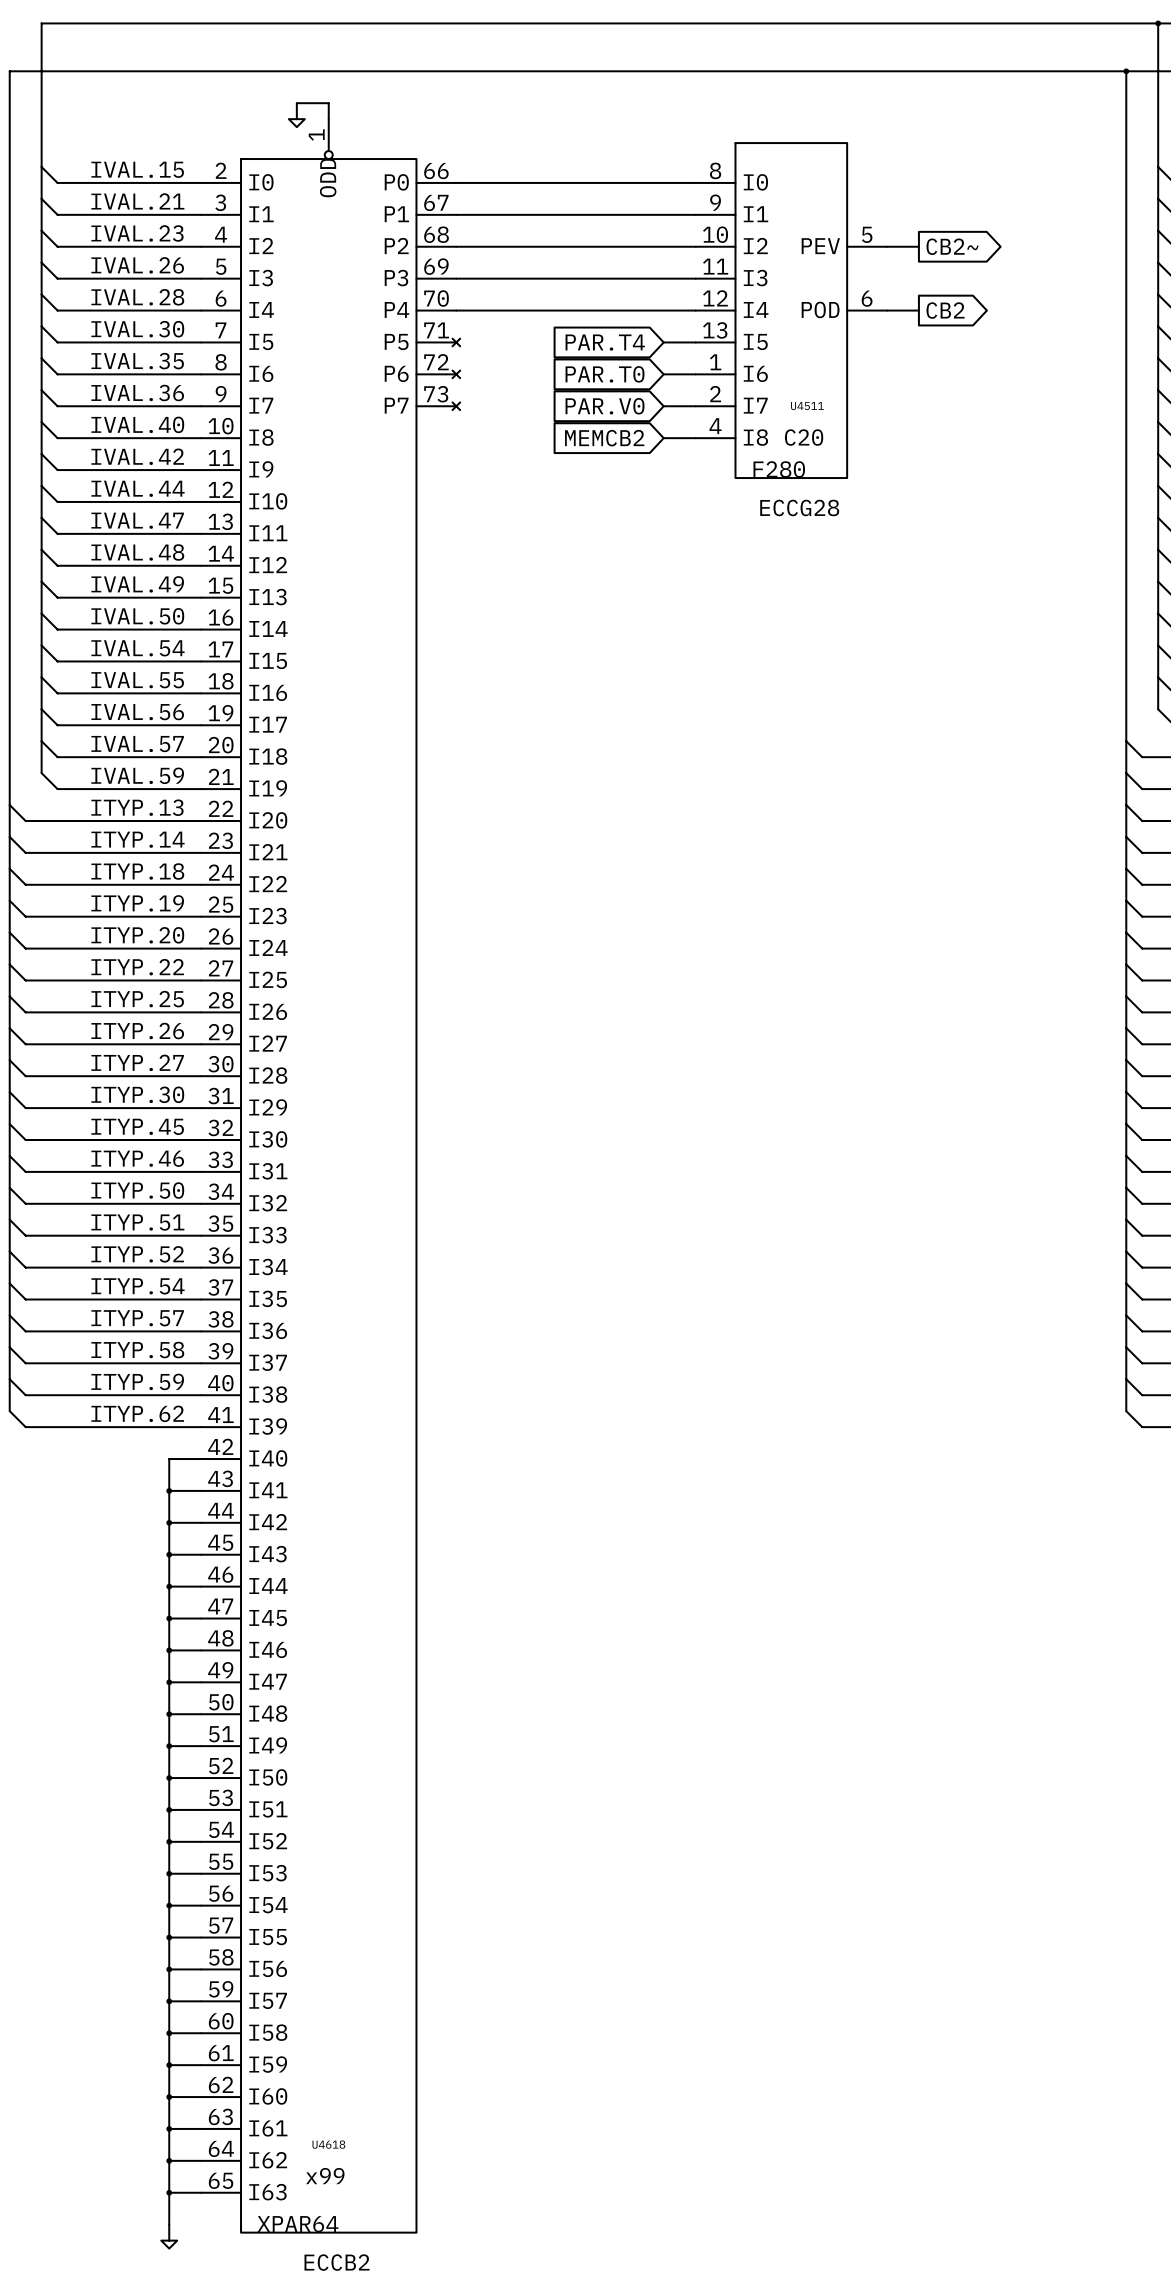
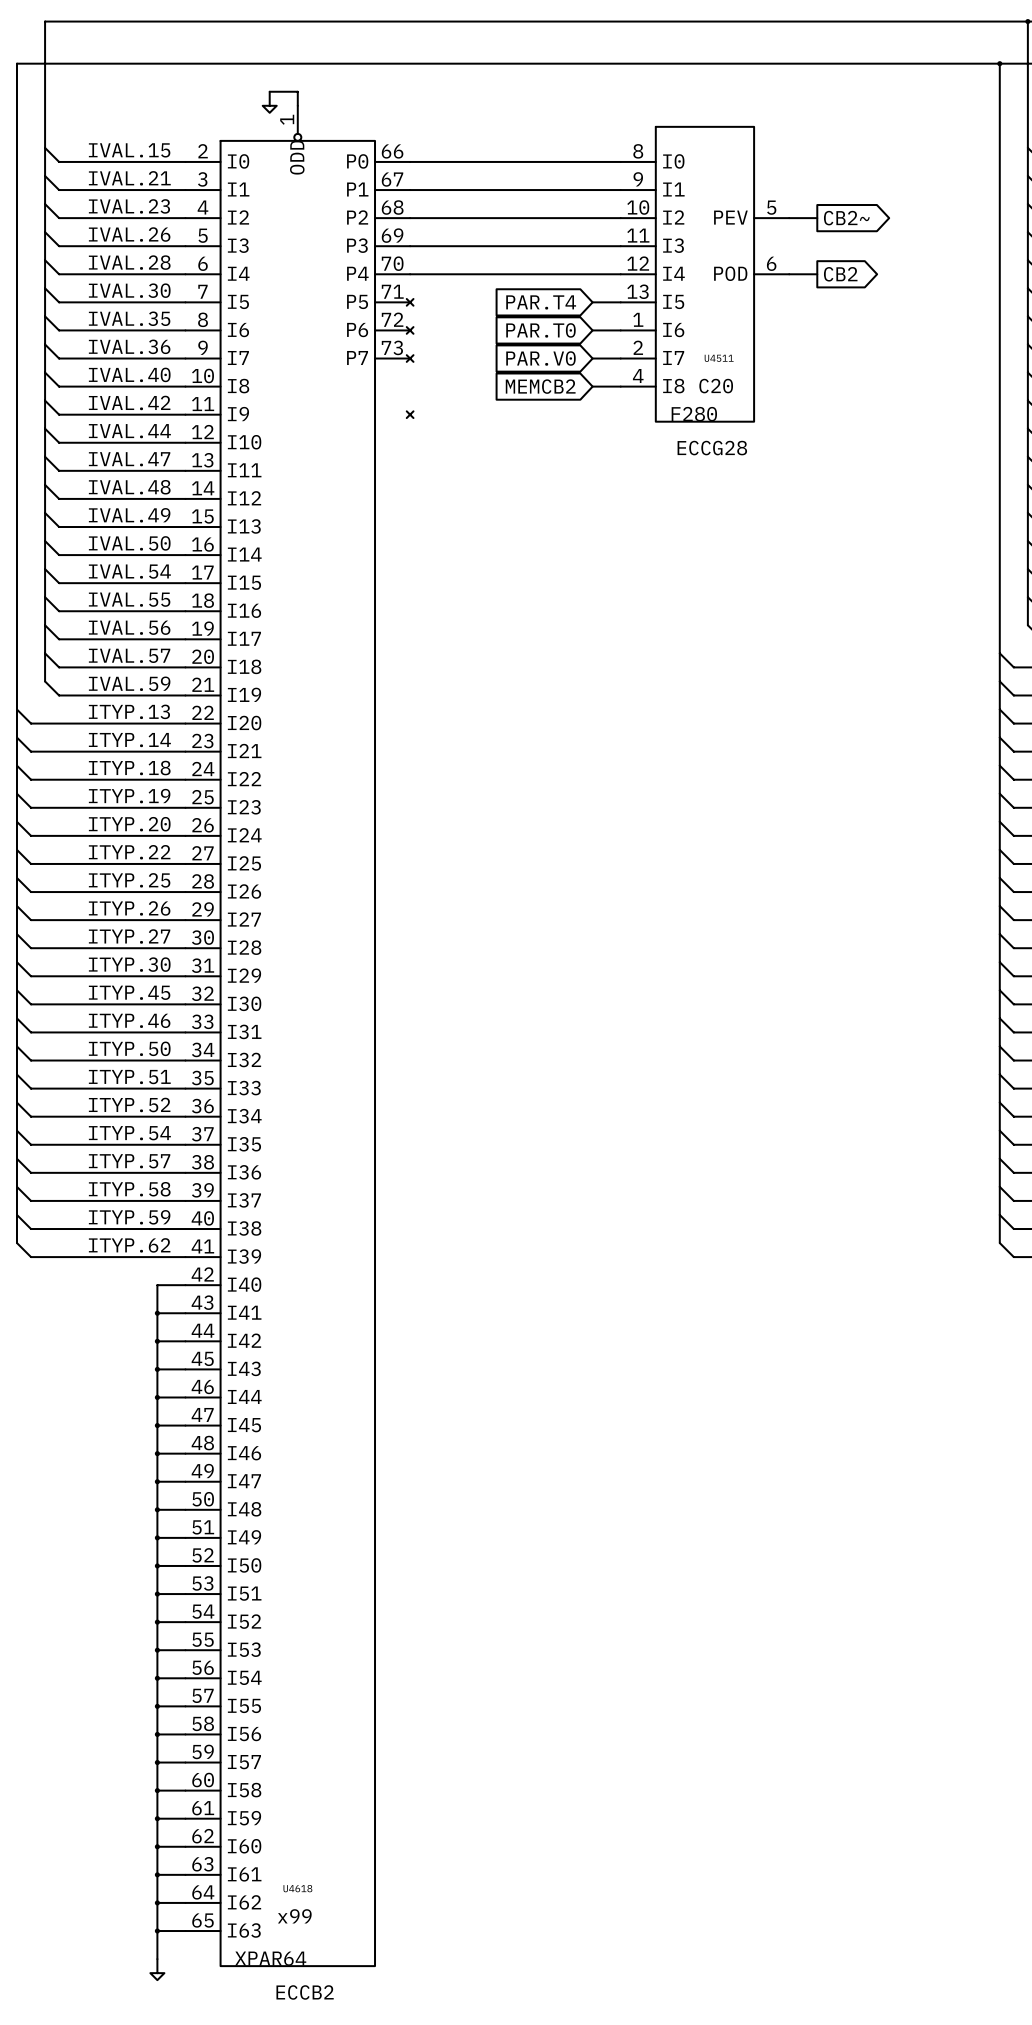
no-connect mark: none -> (410, 414)

